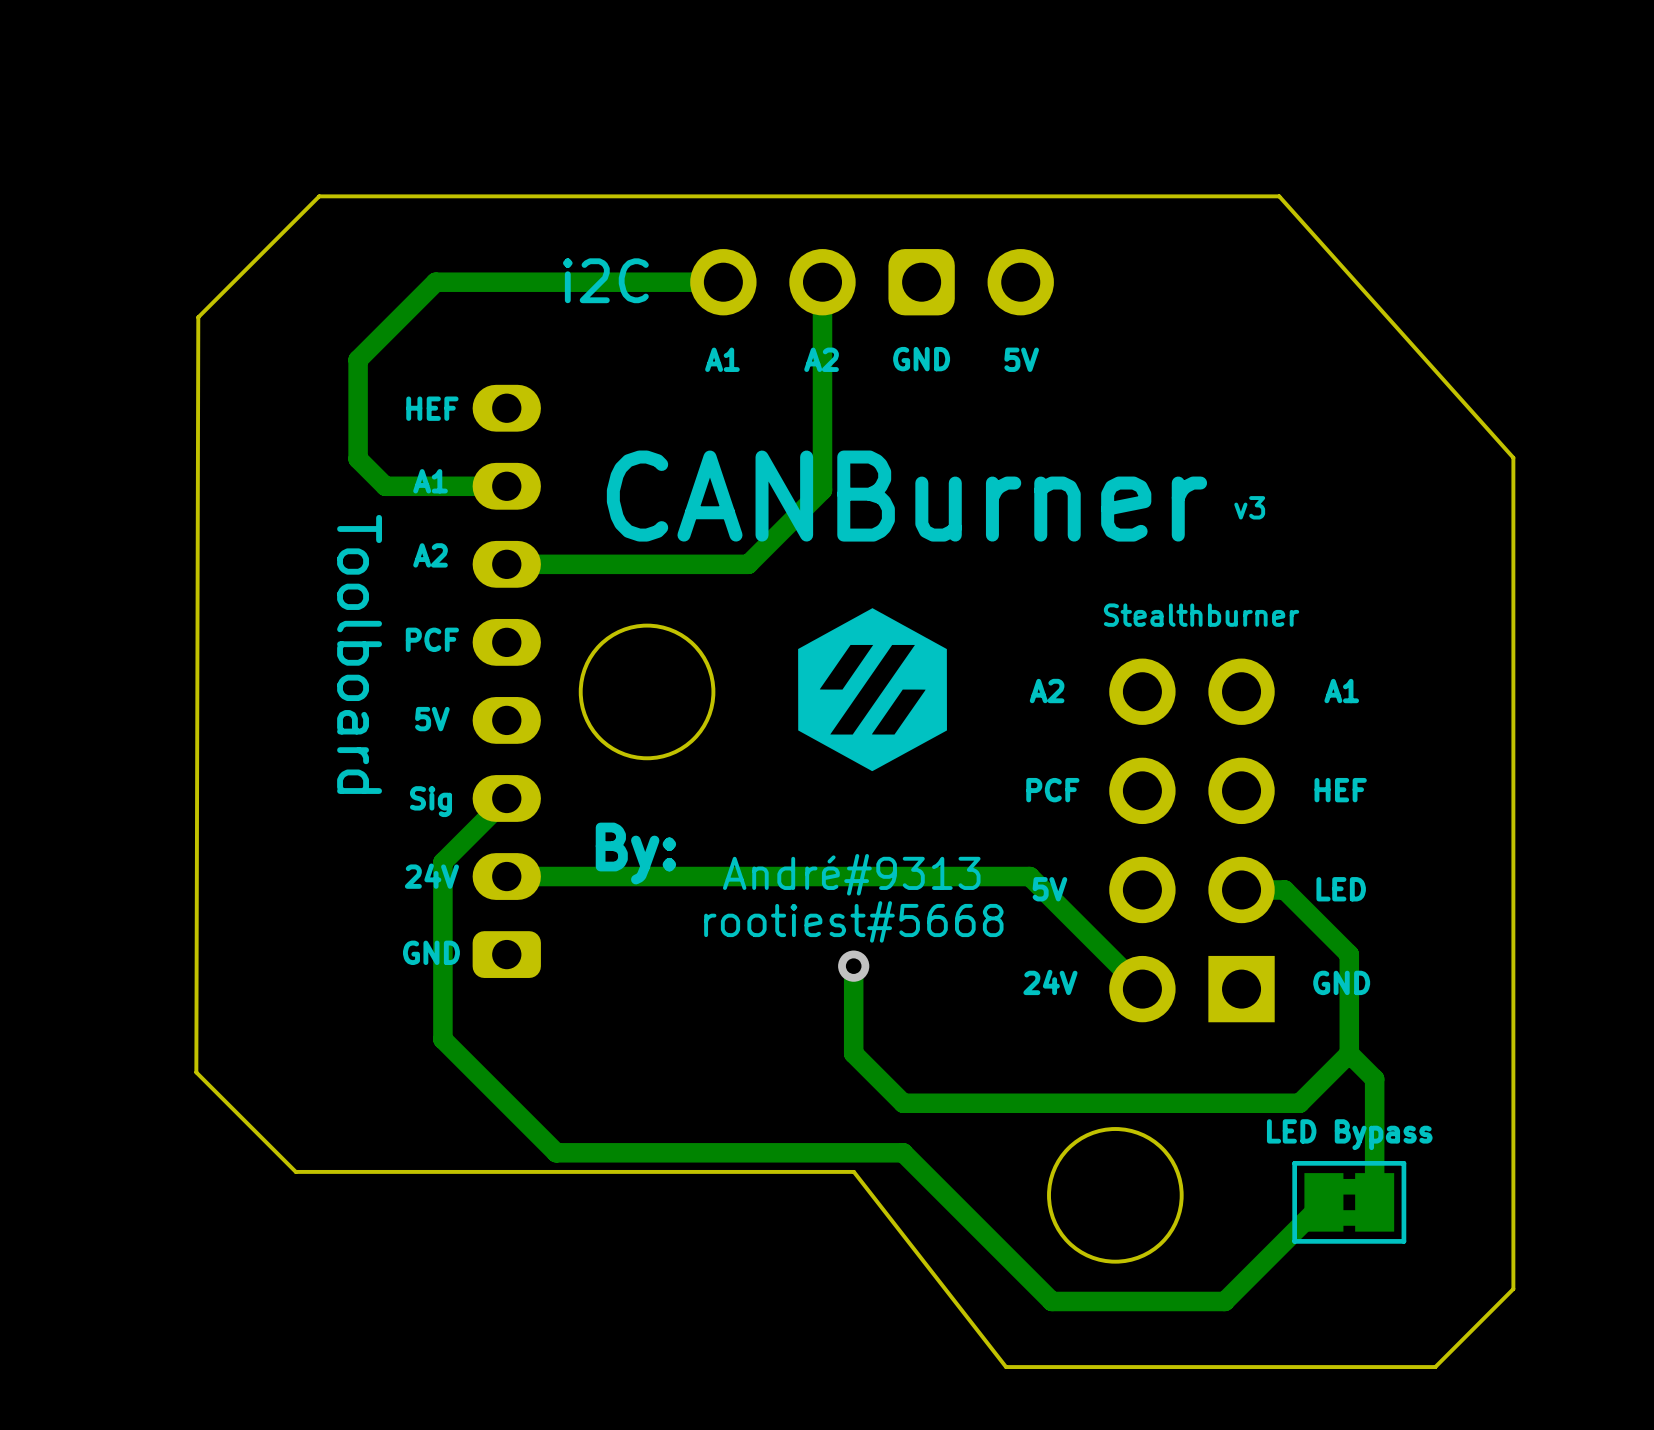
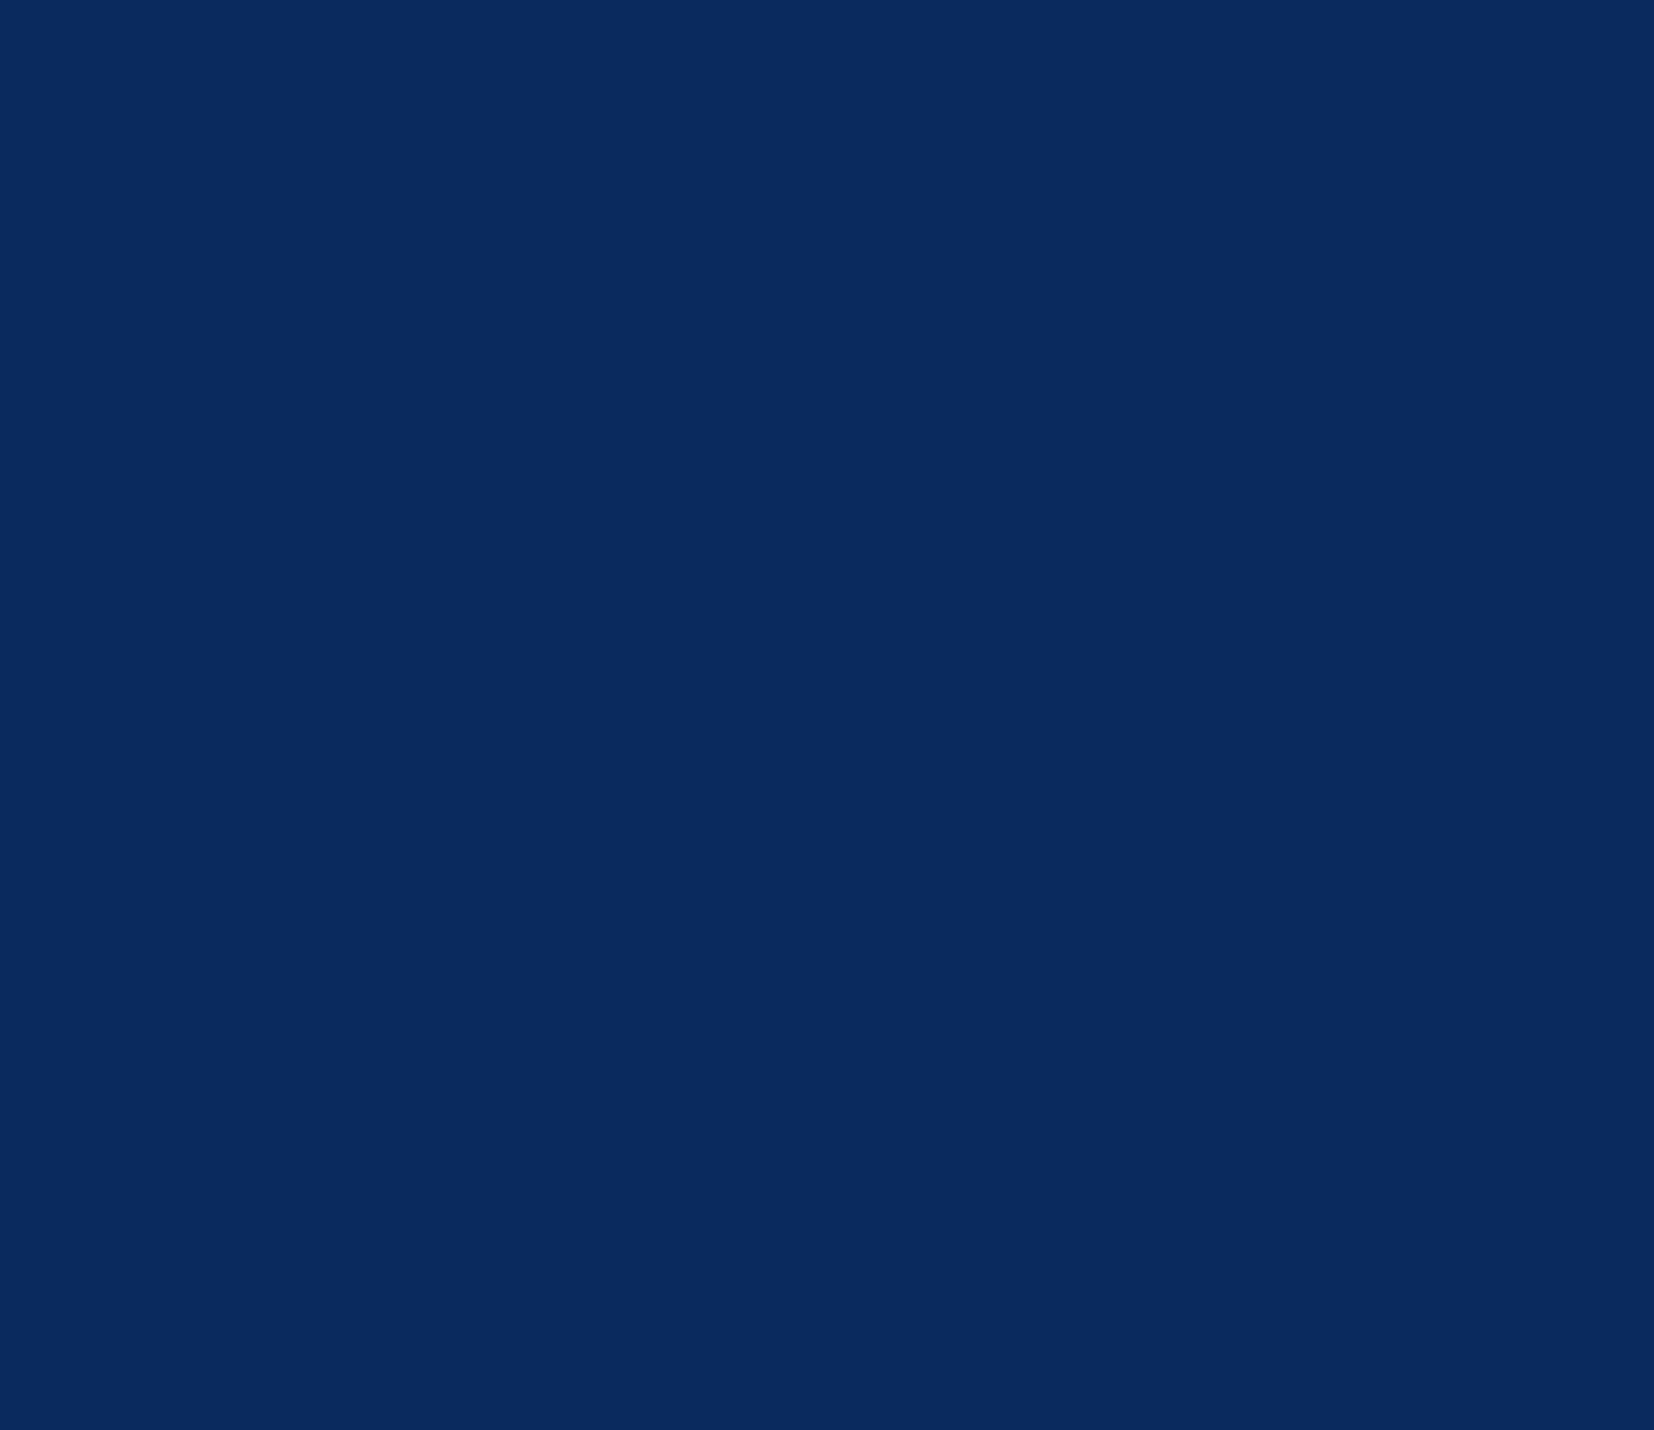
board edge: (1279, 196) (1513, 457) (1513, 1289) (1435, 1367) (1006, 1367) (853, 1171) (295, 1171) (196, 1072) (198, 317) (319, 196) (1279, 196) -> none
text: i2C (605, 280) -> none
track: (723, 282) (435, 282) (358, 359) (358, 458) (385, 486) (506, 486) -> none
track: (822, 282) (822, 490) (748, 564) (506, 564) -> none
part: (872, 282) -> none
text: A1 (722, 359) -> none
text: A2 (821, 359) -> none
text: GND (921, 359) -> none
text: 5V (1021, 359) -> none
text: HEF (432, 408) -> none
text: A1 (430, 481) -> none
text: CANBurner (906, 496) -> none
text: v3 (1249, 507) -> none
text: A2 (430, 555) -> none
drawing: [798, 608, 947, 772] -> none
text: Stealthburner (1201, 615) -> none
round board edge: [578, 623, 716, 761] -> none
text: PCF (432, 639) -> none
text: Toolboard (359, 654) -> none
part: (506, 681) -> none
text: A2 (1047, 691) -> none
text: A1 (1341, 691) -> none
text: 5V (432, 719) -> none
text: PCF (1052, 790) -> none
text: HEF (1340, 790) -> none
track: (506, 798) (442, 862) (442, 1039) (556, 1152) (903, 1152) (1051, 1301) (1224, 1301) (1323, 1202) -> none
text: Sig (430, 801) -> none
part: (1191, 840) -> none
text: By: (635, 853) -> none
text: André#9313 (851, 874) -> none
text: 24V (431, 876) -> none
track: (506, 876) (1029, 876) (1142, 989) -> none
text: 5V (1049, 889) -> none
track: (1241, 889) (1284, 889) (1349, 954) (1349, 1053) -> none
text: LED (1341, 889) -> none
text: rootiest#5668 (853, 921) -> none
text: GND (431, 952) -> none
track: (853, 966) (853, 1053) (903, 1103) (1299, 1103) (1349, 1053) -> none
via: (853, 966) -> none
text: 24V (1050, 982) -> none
text: GND (1341, 982) -> none
track: (1349, 1053) (1374, 1079) (1374, 1202) -> none
round board edge: [1047, 1127, 1184, 1264] -> none
LED Bypass: (1349, 1202) -> none

